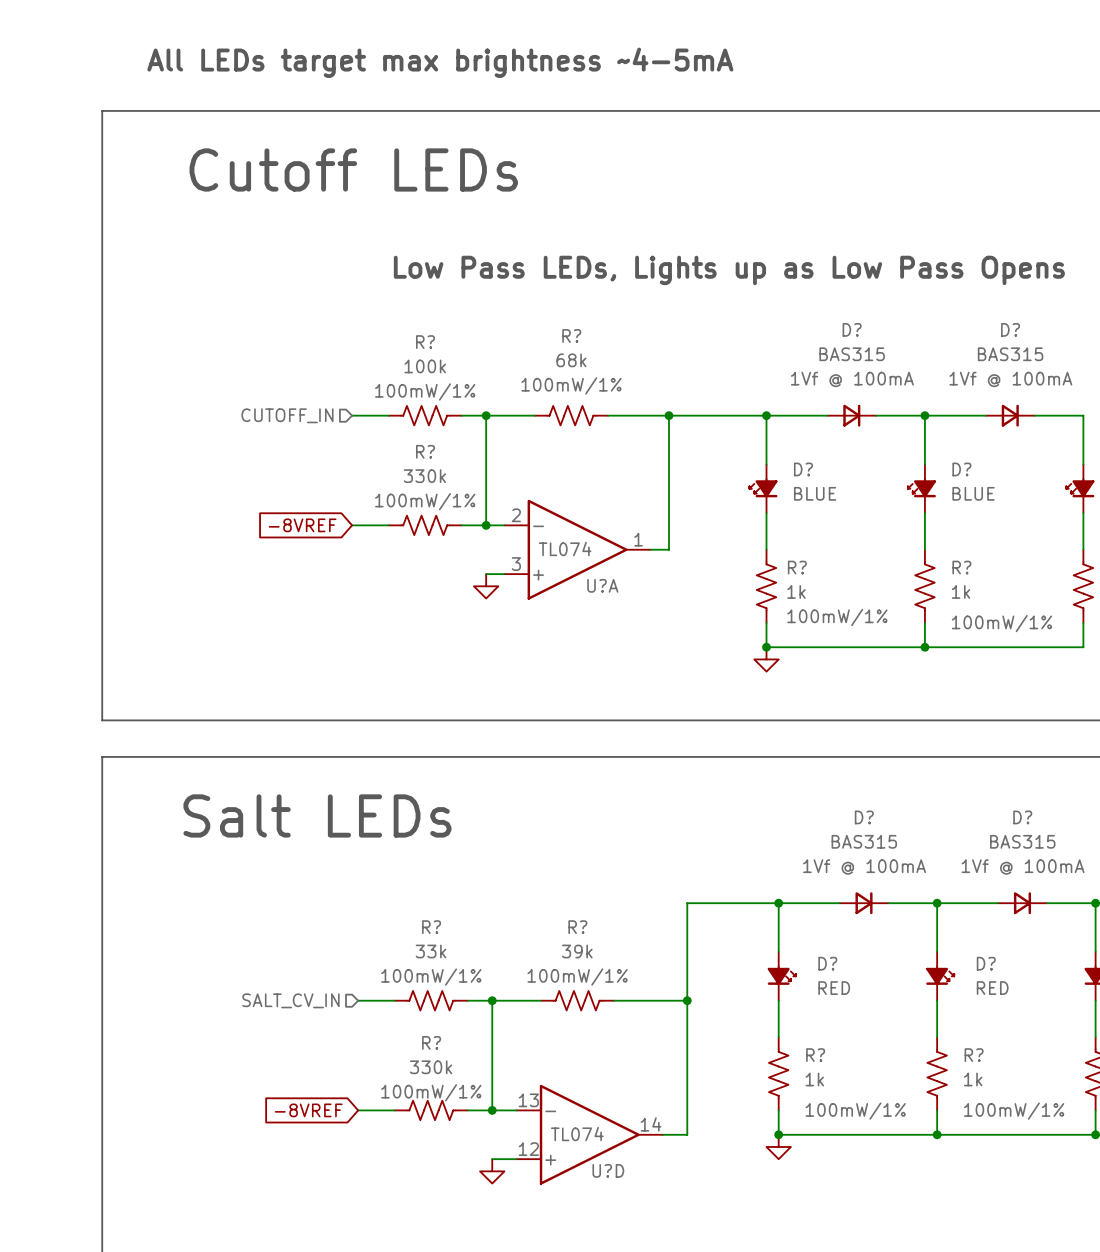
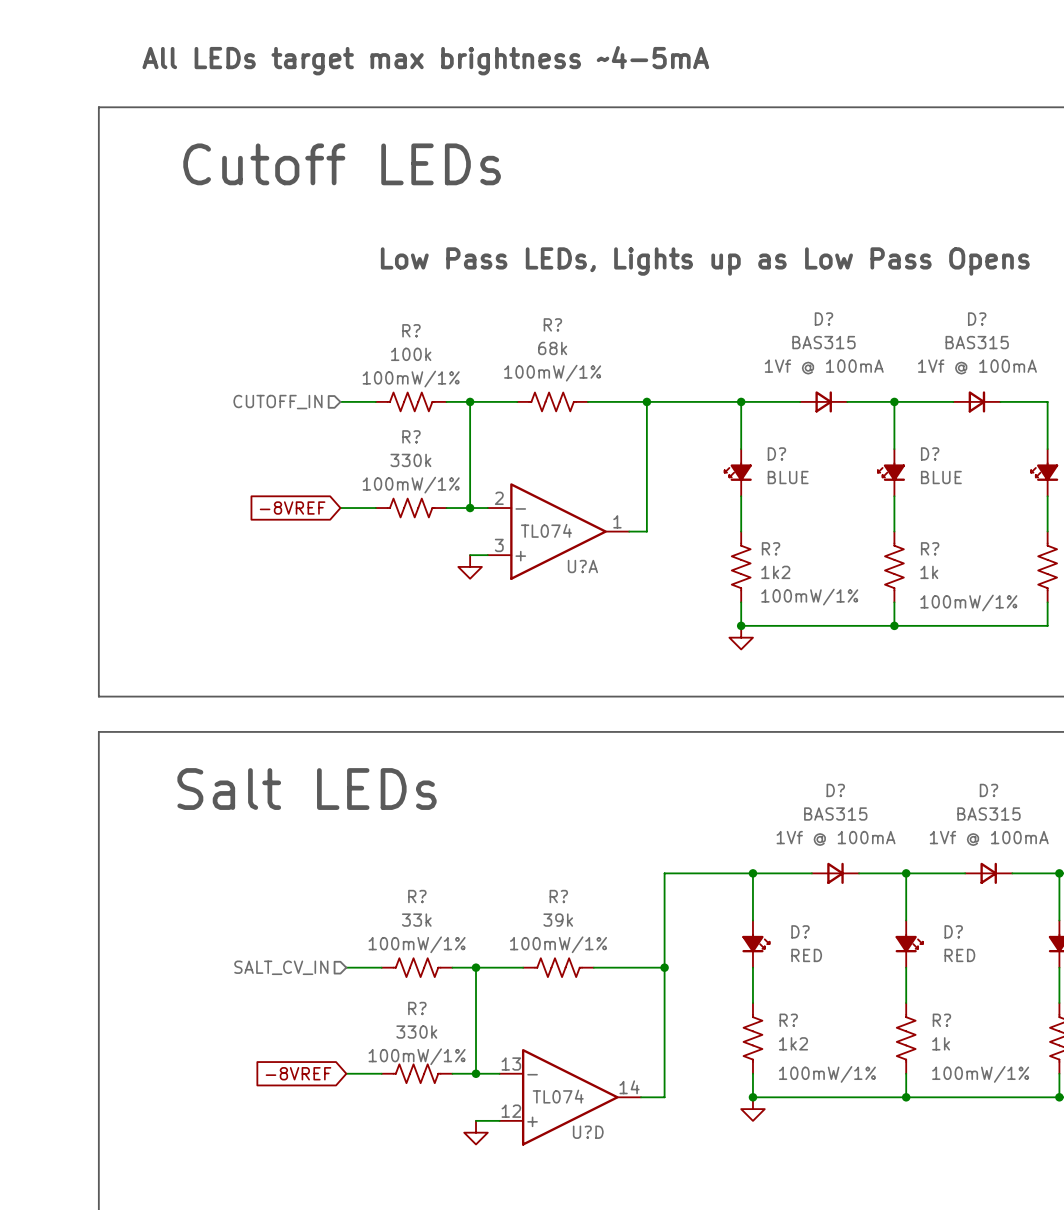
R? value: 1k (796, 591) -> 1k2 (775, 572)
R? value: 1k (814, 1079) -> 1k2 (793, 1043)

